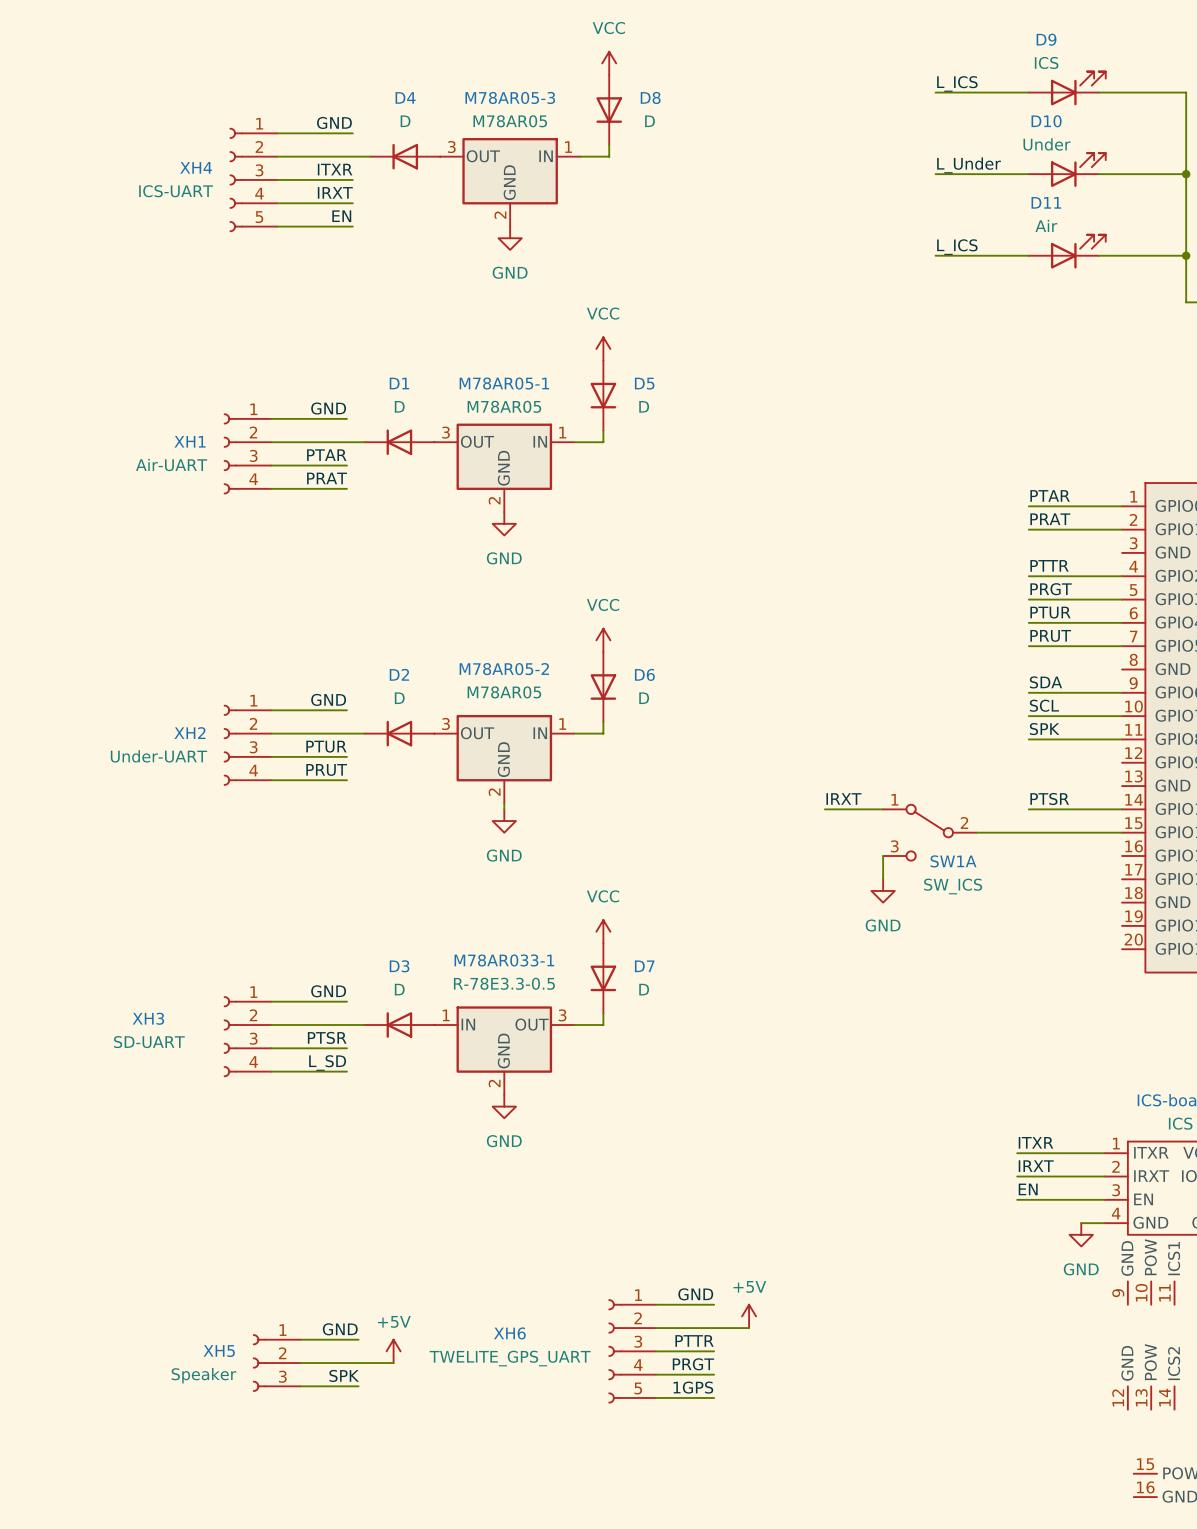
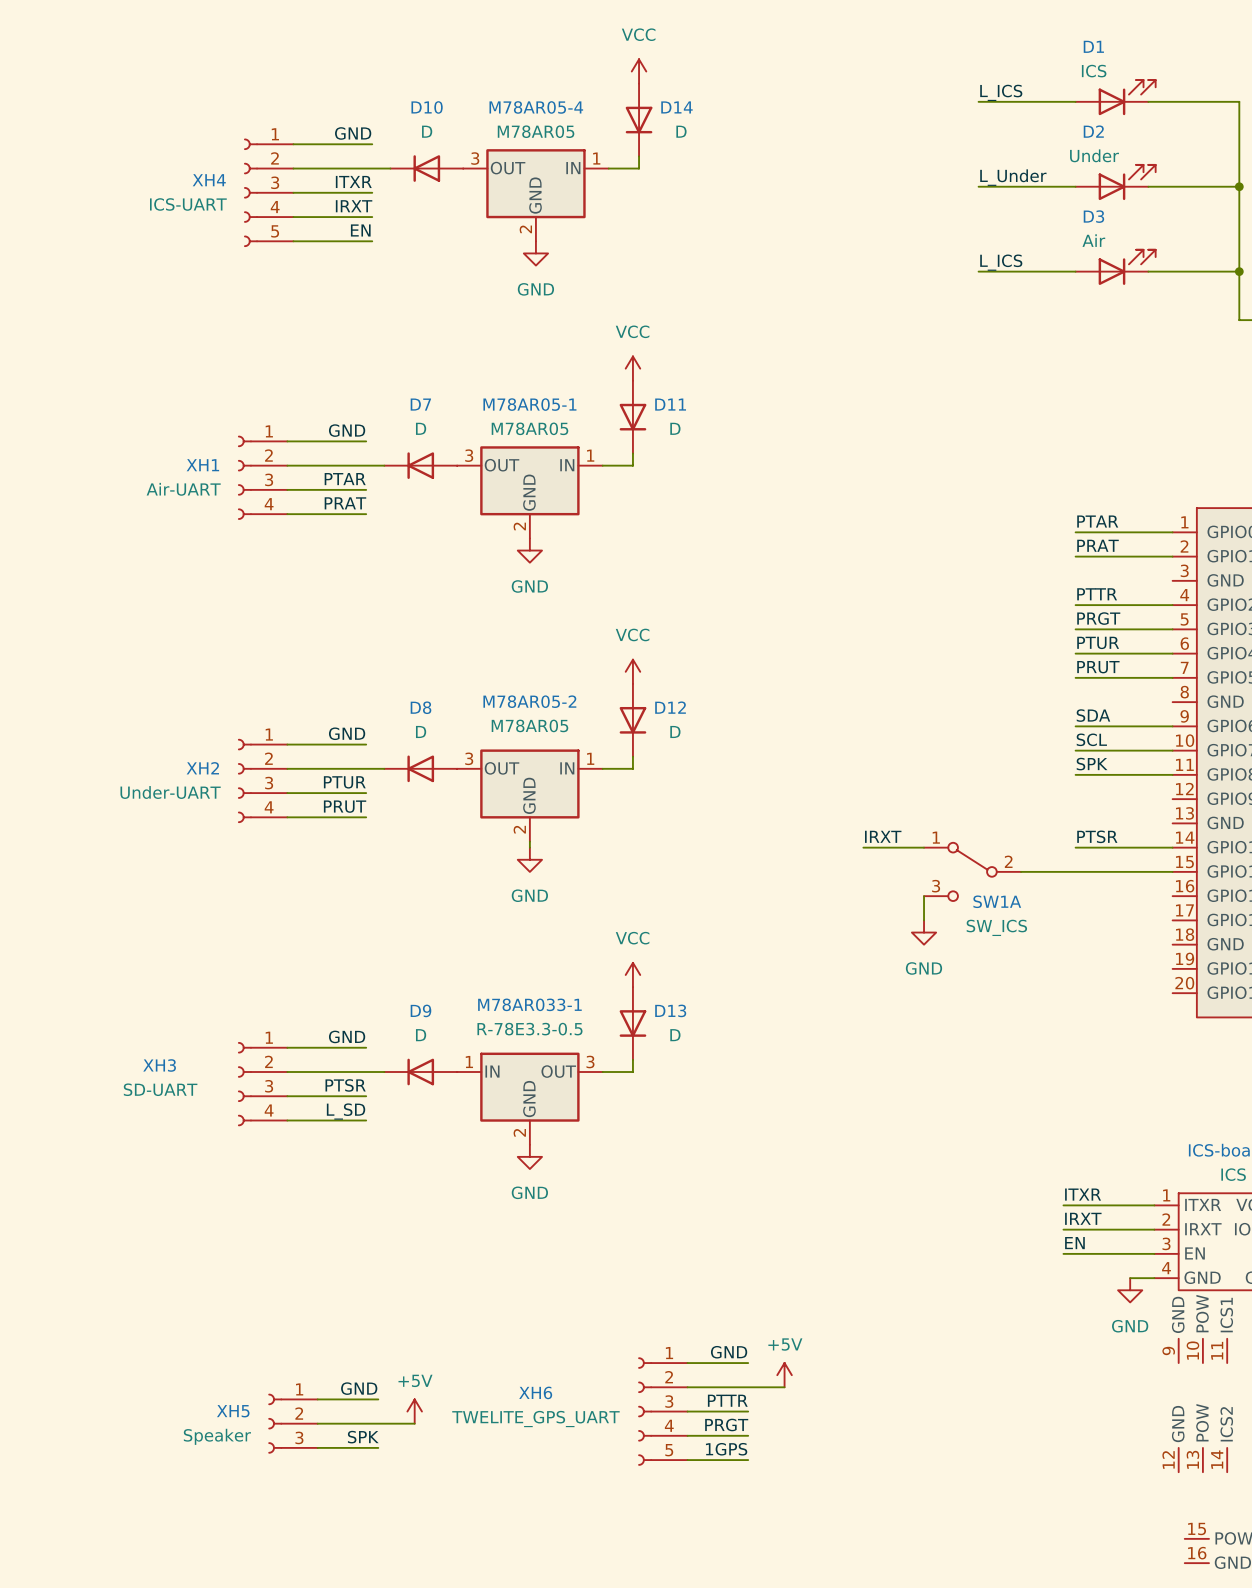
D9 name: D9 (1046, 39) -> D1 (1093, 46)
D4 name: D4 (405, 97) -> D10 (427, 107)
M78AR05-3 name: M78AR05-3 (510, 97) -> M78AR05-4 (536, 107)
D8 name: D8 (650, 97) -> D14 (676, 107)
D10 name: D10 (1046, 121) -> D2 (1093, 131)
D11 name: D11 (1046, 202) -> D3 (1093, 216)
D1 name: D1 (399, 383) -> D7 (420, 404)
D5 name: D5 (644, 383) -> D11 (670, 404)
D2 name: D2 (399, 674) -> D8 (420, 707)
D6 name: D6 (644, 674) -> D12 (670, 707)
D3 name: D3 (399, 966) -> D9 (420, 1010)
D7 name: D7 (644, 966) -> D13 (670, 1010)

